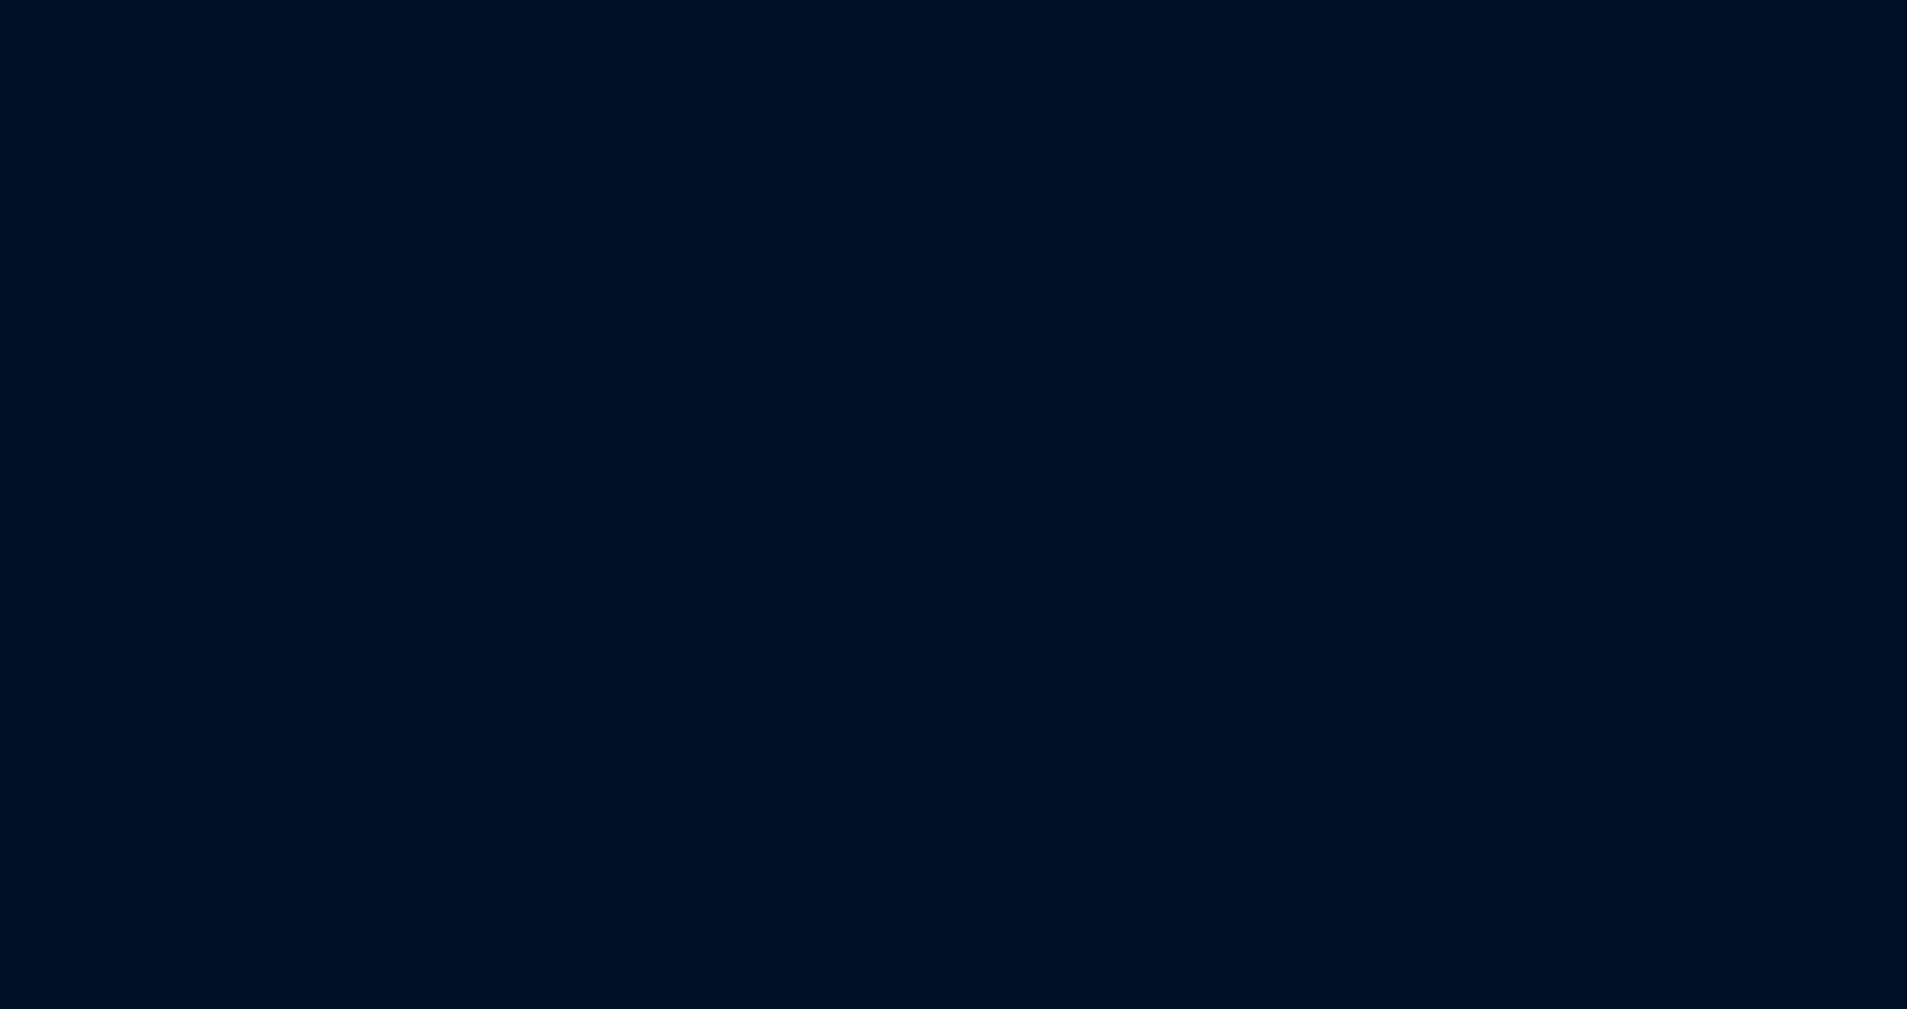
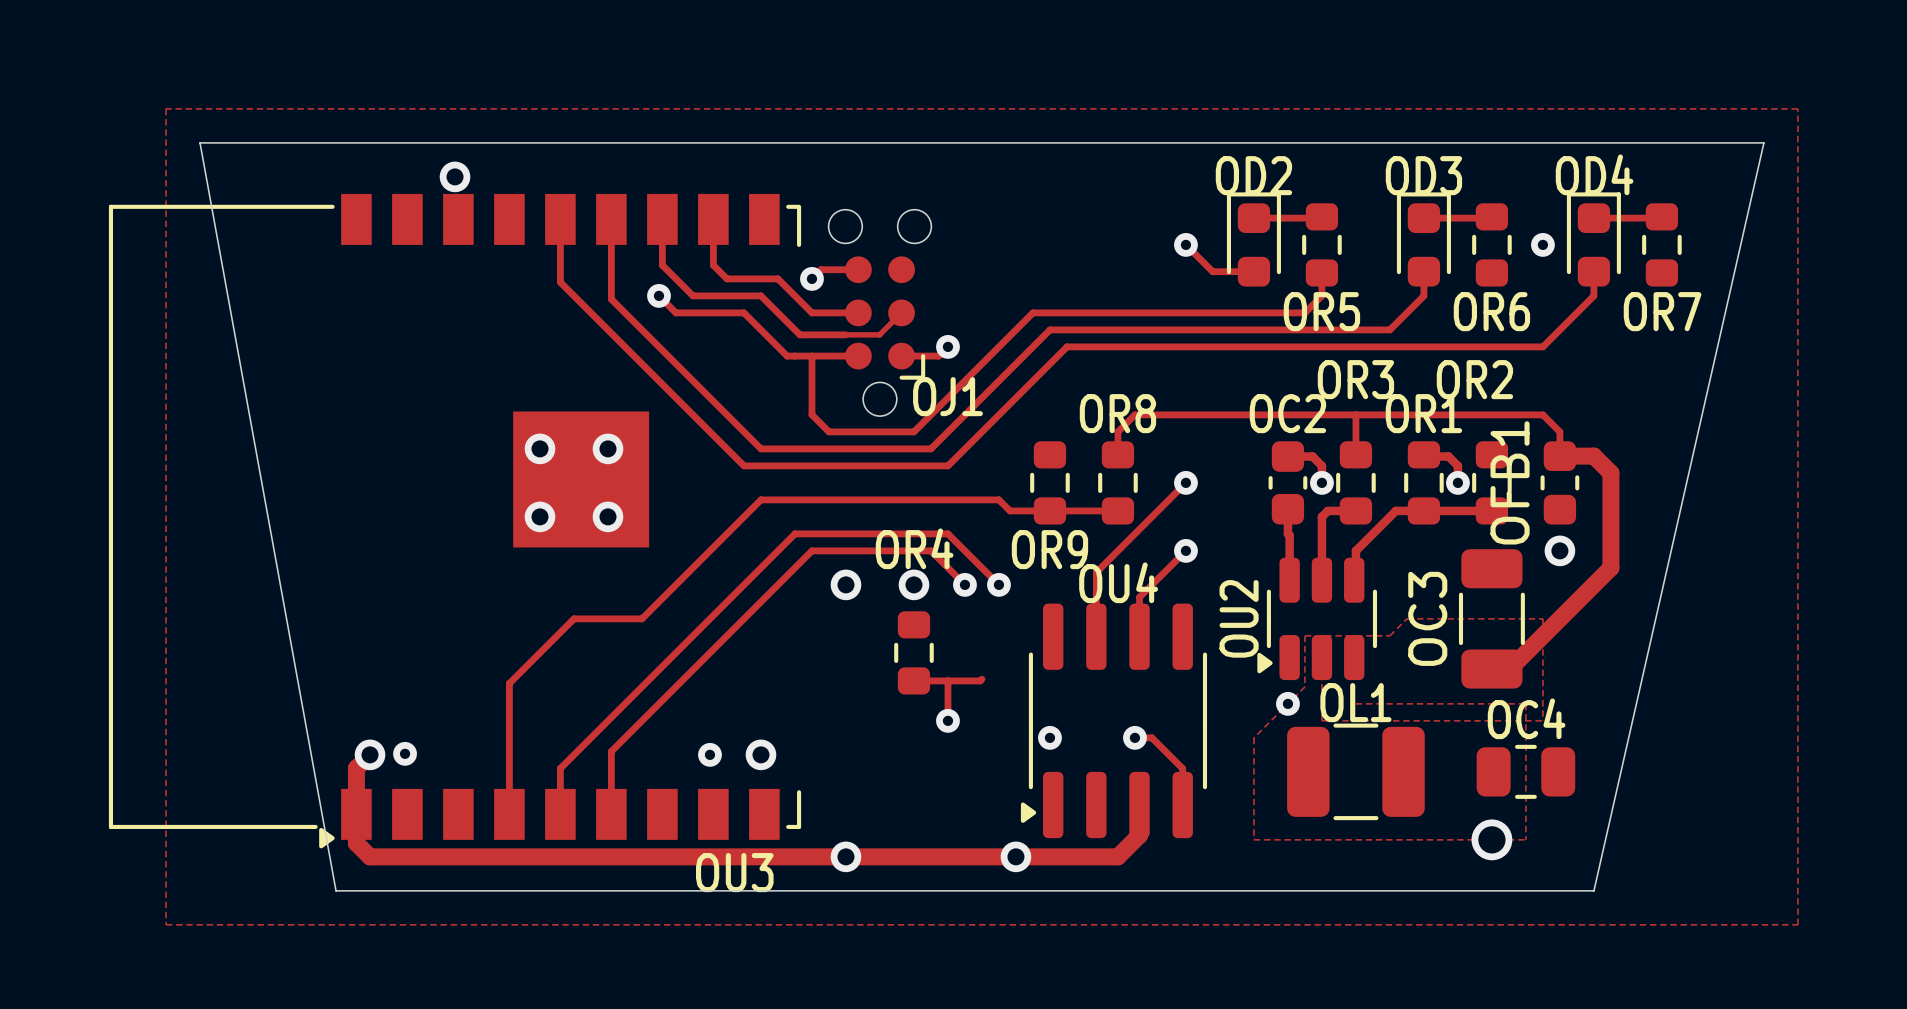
zone outline: none -> (166, 108) (1797, 108) (1797, 924) (166, 924) (166, 108)
board edge: none -> (200, 142) (336, 890) (1593, 890) (1763, 142) (200, 142)
via: none -> (455, 176)
track: none -> (1321, 216) (1253, 218)
track: none -> (1491, 216) (1423, 218)
track: none -> (1661, 216) (1593, 218)
track: none -> (560, 219) (560, 282) (743, 465) (947, 465) (1066, 346) (1542, 346) (1593, 295) (1593, 271)
track: none -> (611, 219) (611, 299) (760, 448) (930, 448) (1049, 329) (1389, 329) (1423, 295) (1423, 271)
track: none -> (662, 219) (662, 265) (692, 295) (760, 295) (799, 334) (879, 334) (901, 312)
track: none -> (713, 219) (713, 265) (726, 278) (777, 278) (811, 312) (858, 312)
OD2: none -> (1253, 239)
OD3: none -> (1423, 239)
OD4: none -> (1593, 239)
track: none -> (1185, 244) (1212, 271) (1253, 271)
via: none -> (1185, 244)
OR5: none -> (1321, 244)
OR6: none -> (1491, 244)
via: none -> (1542, 244)
OR7: none -> (1661, 244)
track: none -> (858, 269) (821, 269) (811, 278)
track: none -> (1321, 272) (1321, 295) (1304, 312) (1032, 312) (913, 431) (828, 431) (811, 414) (811, 356)
via: none -> (811, 278)
track: none -> (658, 295) (675, 312) (743, 312) (787, 356) (858, 356)
via: none -> (658, 295)
OJ1: none -> (879, 312)
track: none -> (947, 346) (938, 356) (901, 356)
via: none -> (947, 346)
track: none -> (1355, 414) (1355, 454)
via: none -> (540, 448)
via: none -> (608, 448)
track: none -> (1117, 454) (1117, 431) (1134, 414) (1542, 414) (1559, 431) (1559, 456) (1593, 456) (1610, 473) (1610, 567) (1509, 669) (1491, 669)
track: none -> (1287, 456) (1312, 456) (1321, 465) (1321, 482)
track: none -> (1423, 456) (1448, 456) (1457, 465) (1457, 482)
OR9: none -> (1049, 482)
OR8: none -> (1117, 482)
track: none -> (1185, 482) (1096, 572) (1096, 636)
via: none -> (1185, 482)
OC2: none -> (1287, 482)
via: none -> (1321, 482)
OR3: none -> (1355, 482)
OR1: none -> (1423, 482)
via: none -> (1457, 482)
OR2: none -> (1491, 482)
OFB1: none -> (1559, 482)
track: none -> (1287, 509) (1289, 580)
track: none -> (1117, 510) (1010, 510) (998, 499) (760, 499) (641, 618) (574, 618) (509, 683) (509, 814)
track: none -> (1355, 510) (1327, 510) (1321, 516) (1321, 580)
track: none -> (1491, 510) (1395, 510) (1355, 550) (1355, 567)
via: none -> (540, 516)
via: none -> (608, 516)
OU3: none -> (455, 521)
track: none -> (1185, 550) (1139, 597) (1139, 636)
via: none -> (1185, 550)
via: none -> (1559, 550)
via: none -> (845, 584)
via: none -> (913, 584)
track: none -> (964, 584) (930, 550) (811, 550) (611, 751) (611, 814)
via: none -> (964, 584)
track: none -> (998, 584) (947, 533) (794, 533) (560, 768) (560, 814)
via: none -> (998, 584)
OU2: none -> (1317, 618)
OC3: none -> (1491, 618)
zone outline: none -> (1321, 635) (1321, 720) (1542, 720) (1542, 618) (1406, 618) (1389, 635) (1304, 635) (1304, 686) (1253, 737) (1253, 839) (1525, 839) (1525, 703) (1355, 703)
OR4: none -> (913, 652)
track: none -> (981, 679) (980, 680) (913, 680)
track: none -> (947, 680) (947, 720)
via: none -> (1287, 703)
via: none -> (947, 720)
OU4: none -> (1113, 720)
via: none -> (1049, 737)
track: none -> (1134, 737) (1151, 737) (1182, 768) (1182, 805)
via: none -> (1134, 737)
via: none -> (405, 753)
track: none -> (370, 754) (356, 768) (356, 843) (370, 856) (1117, 856) (1139, 835) (1139, 805)
via: none -> (370, 754)
via: none -> (709, 754)
via: none -> (760, 754)
OL1: none -> (1355, 771)
OC4: none -> (1525, 771)
via: none -> (1491, 839)
via: none -> (845, 856)
via: none -> (1015, 856)

